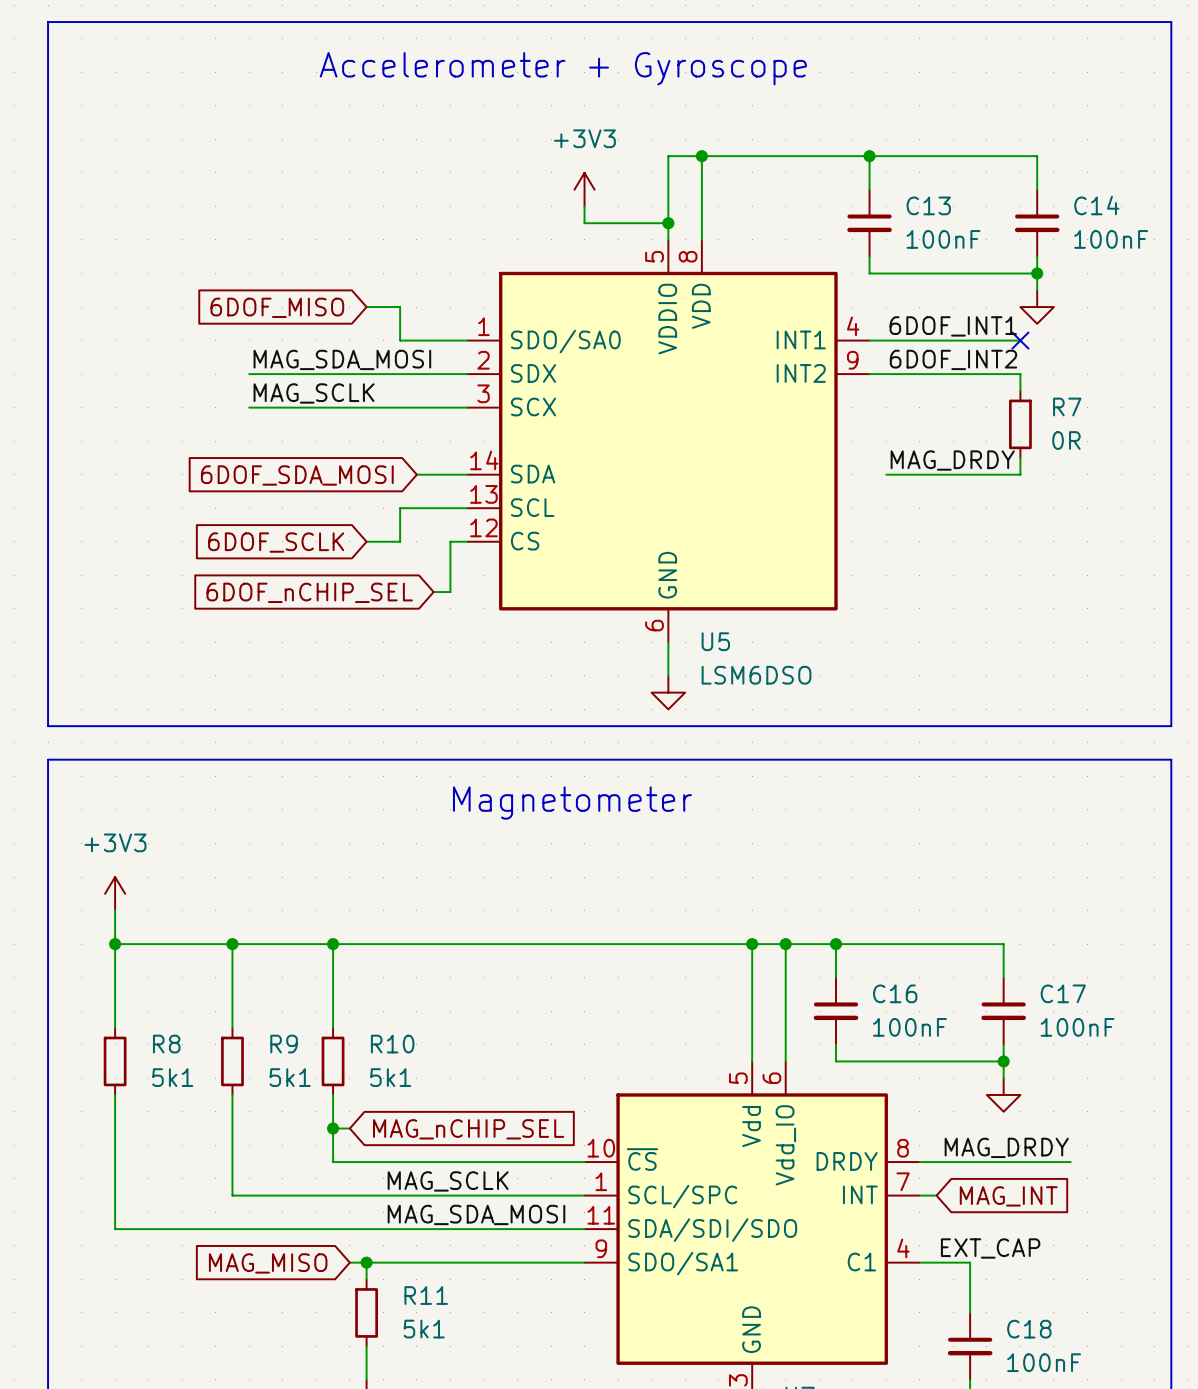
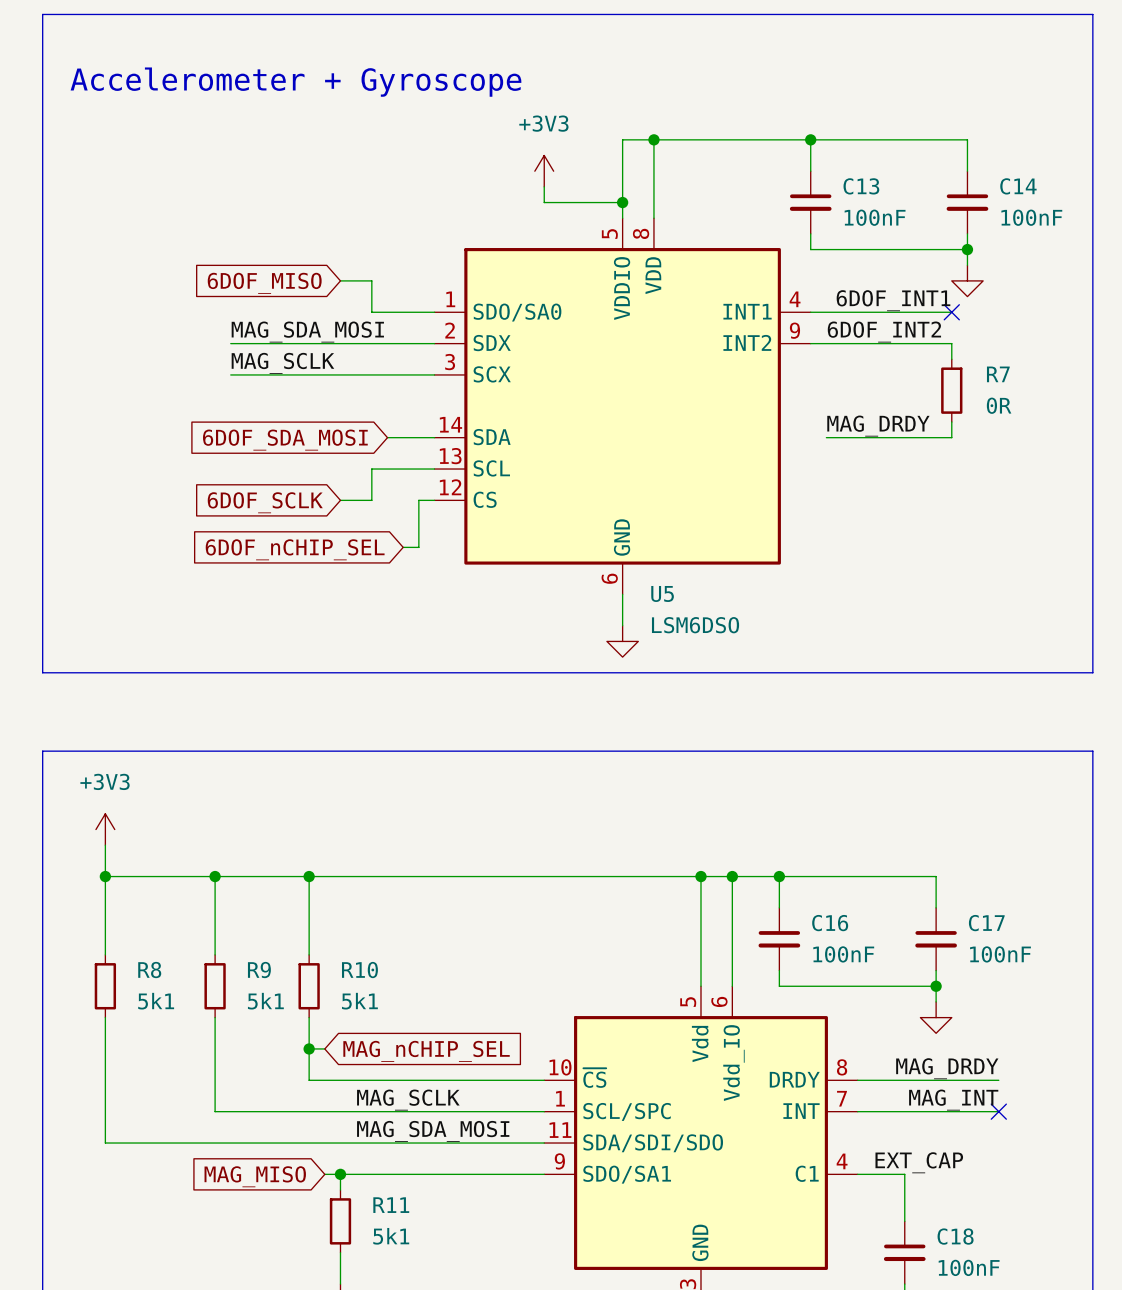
text position: Accelerometer + Gyroscope (563, 68) -> Accelerometer + Gyroscope (295, 82)
text: Magnetometer (572, 803) -> none
line: (48, 809) (48, 759) (1171, 759) (1171, 809) -> (42, 751) (1092, 751)
label: none -> MAG_INT (953, 1100)
wire: none -> (873, 1111) (998, 1111)
no-connect mark: none -> (998, 1111)
global label: MAG_INT (1008, 1196) -> none

